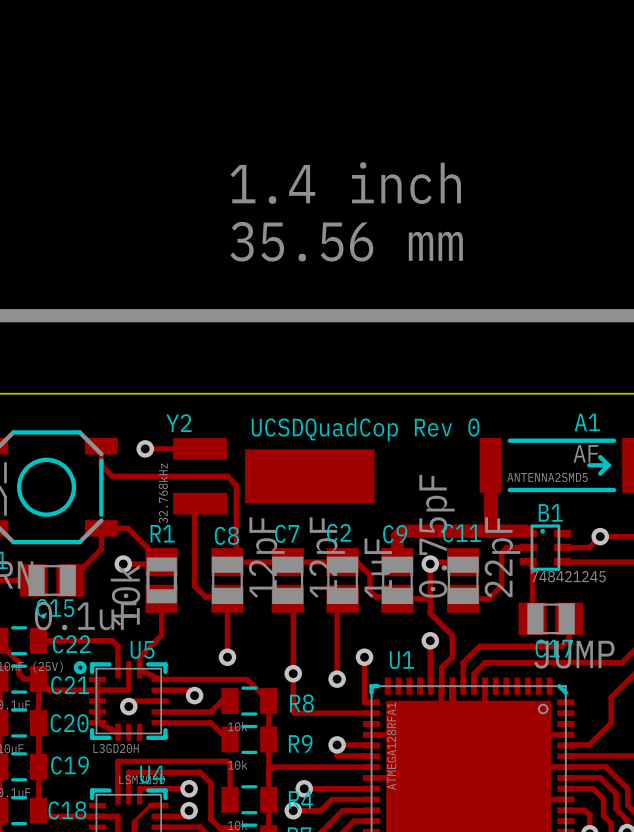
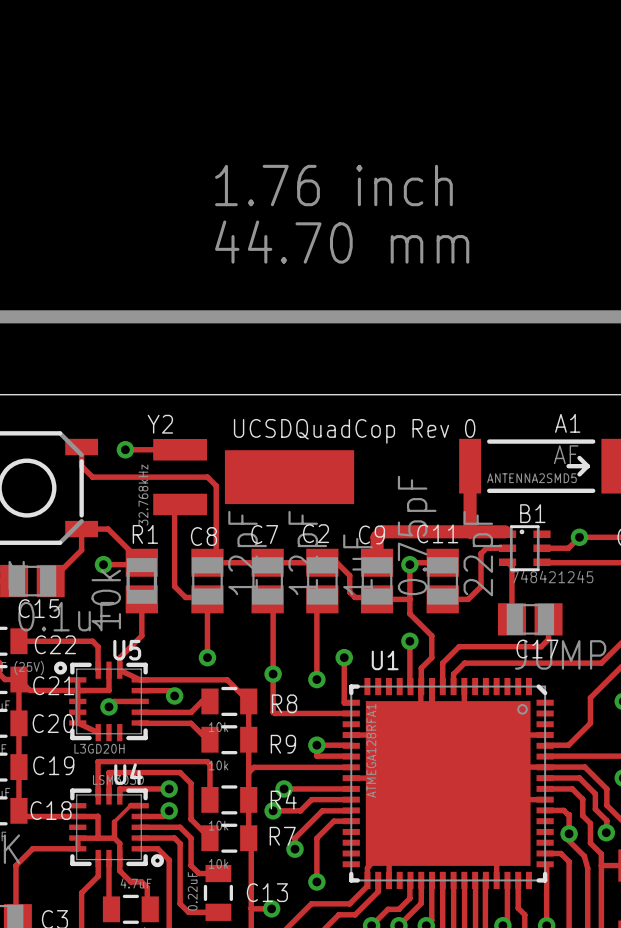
text: 1.4 inch (345, 183) -> 1.76 inch (333, 185)
text: 35.56 mm (346, 241) -> 44.70 mm (342, 242)

